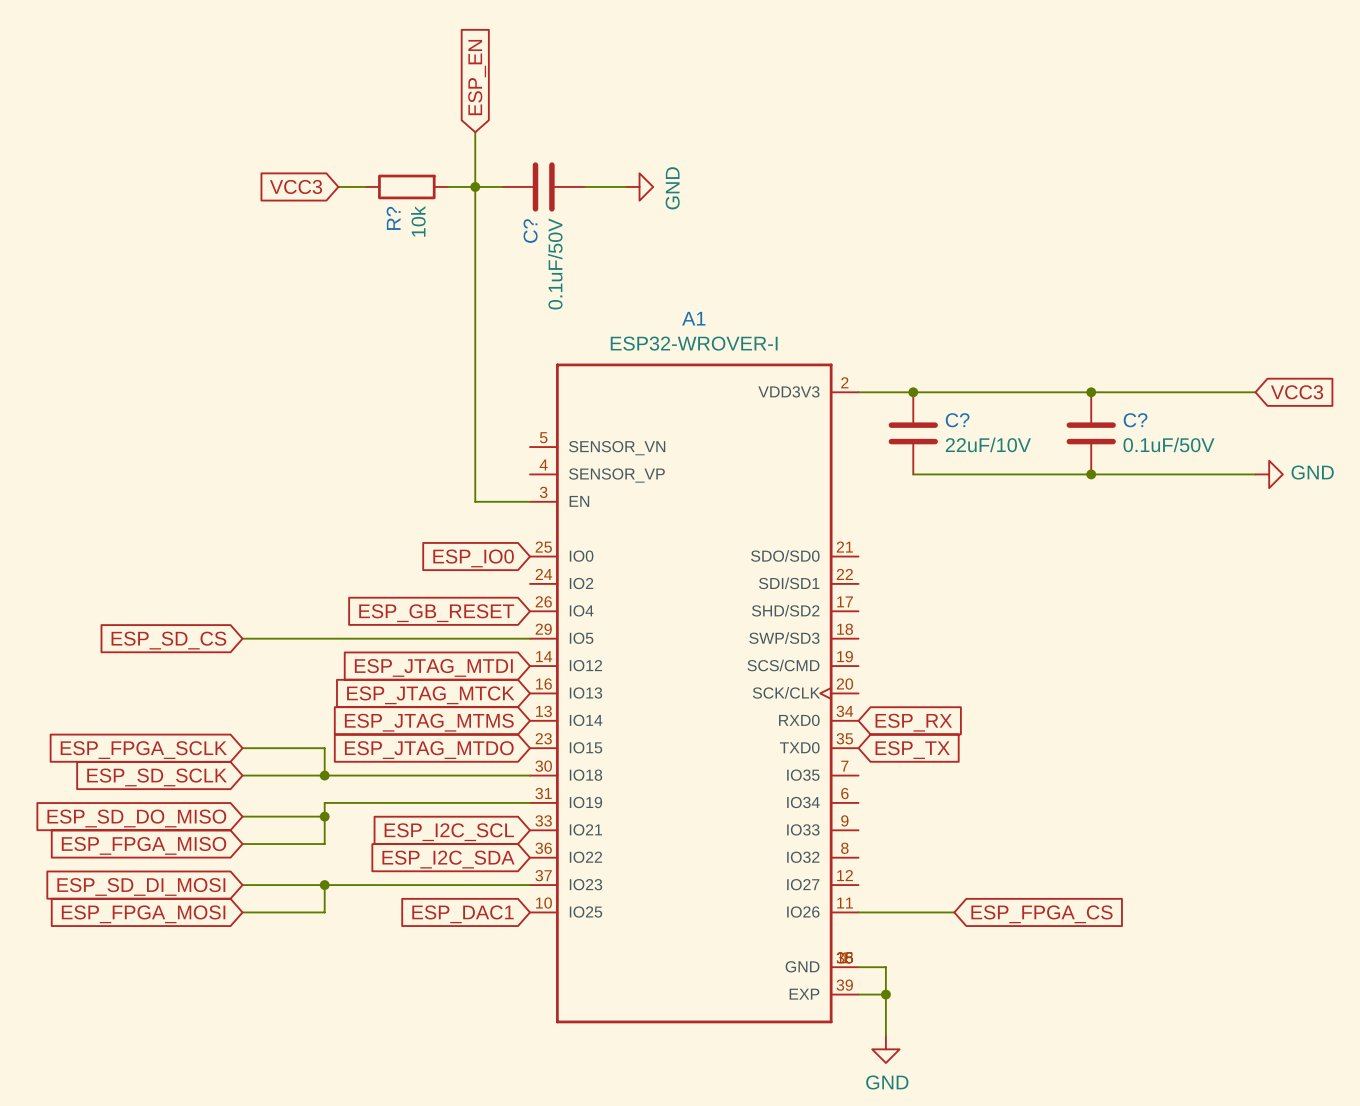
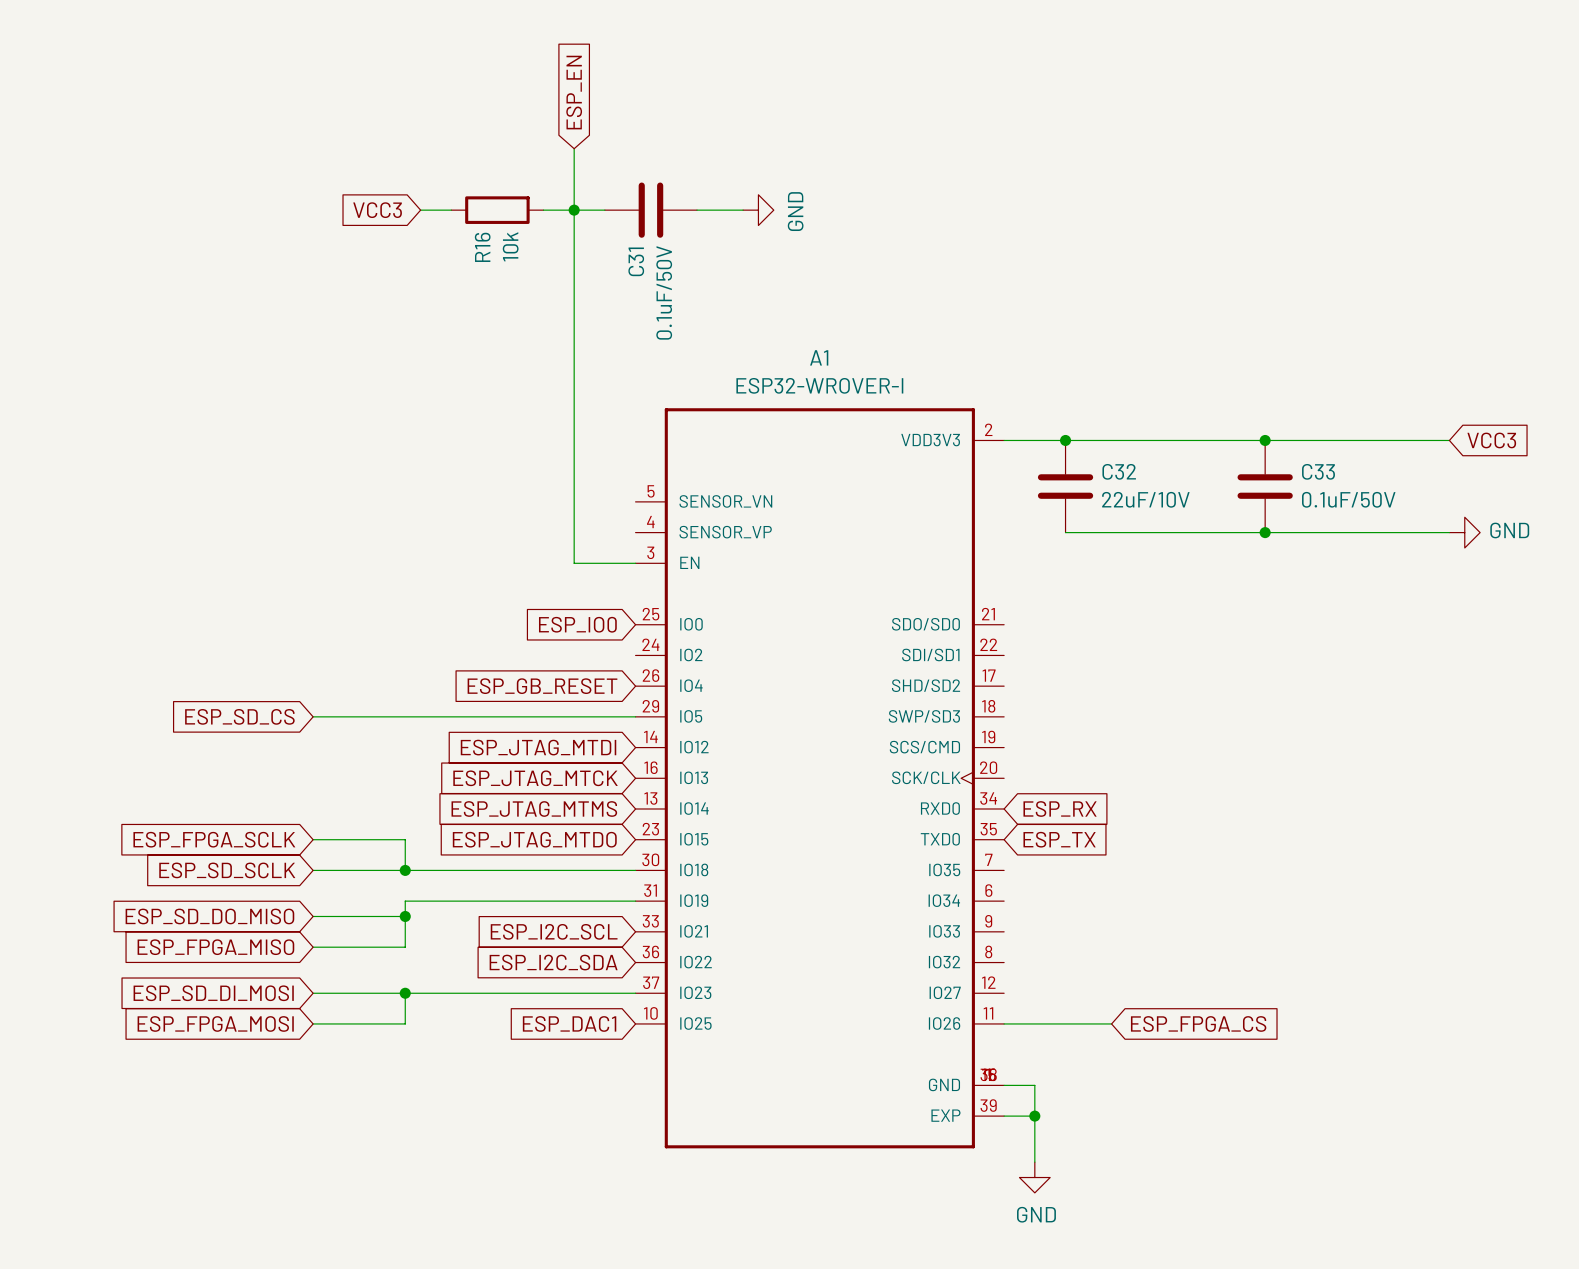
R? name: R? (393, 218) -> R16 (482, 247)
C? name: C? (530, 231) -> C31 (636, 261)
C? name: C? (957, 420) -> C32 (1119, 471)
C? name: C? (1135, 420) -> C33 (1318, 471)

